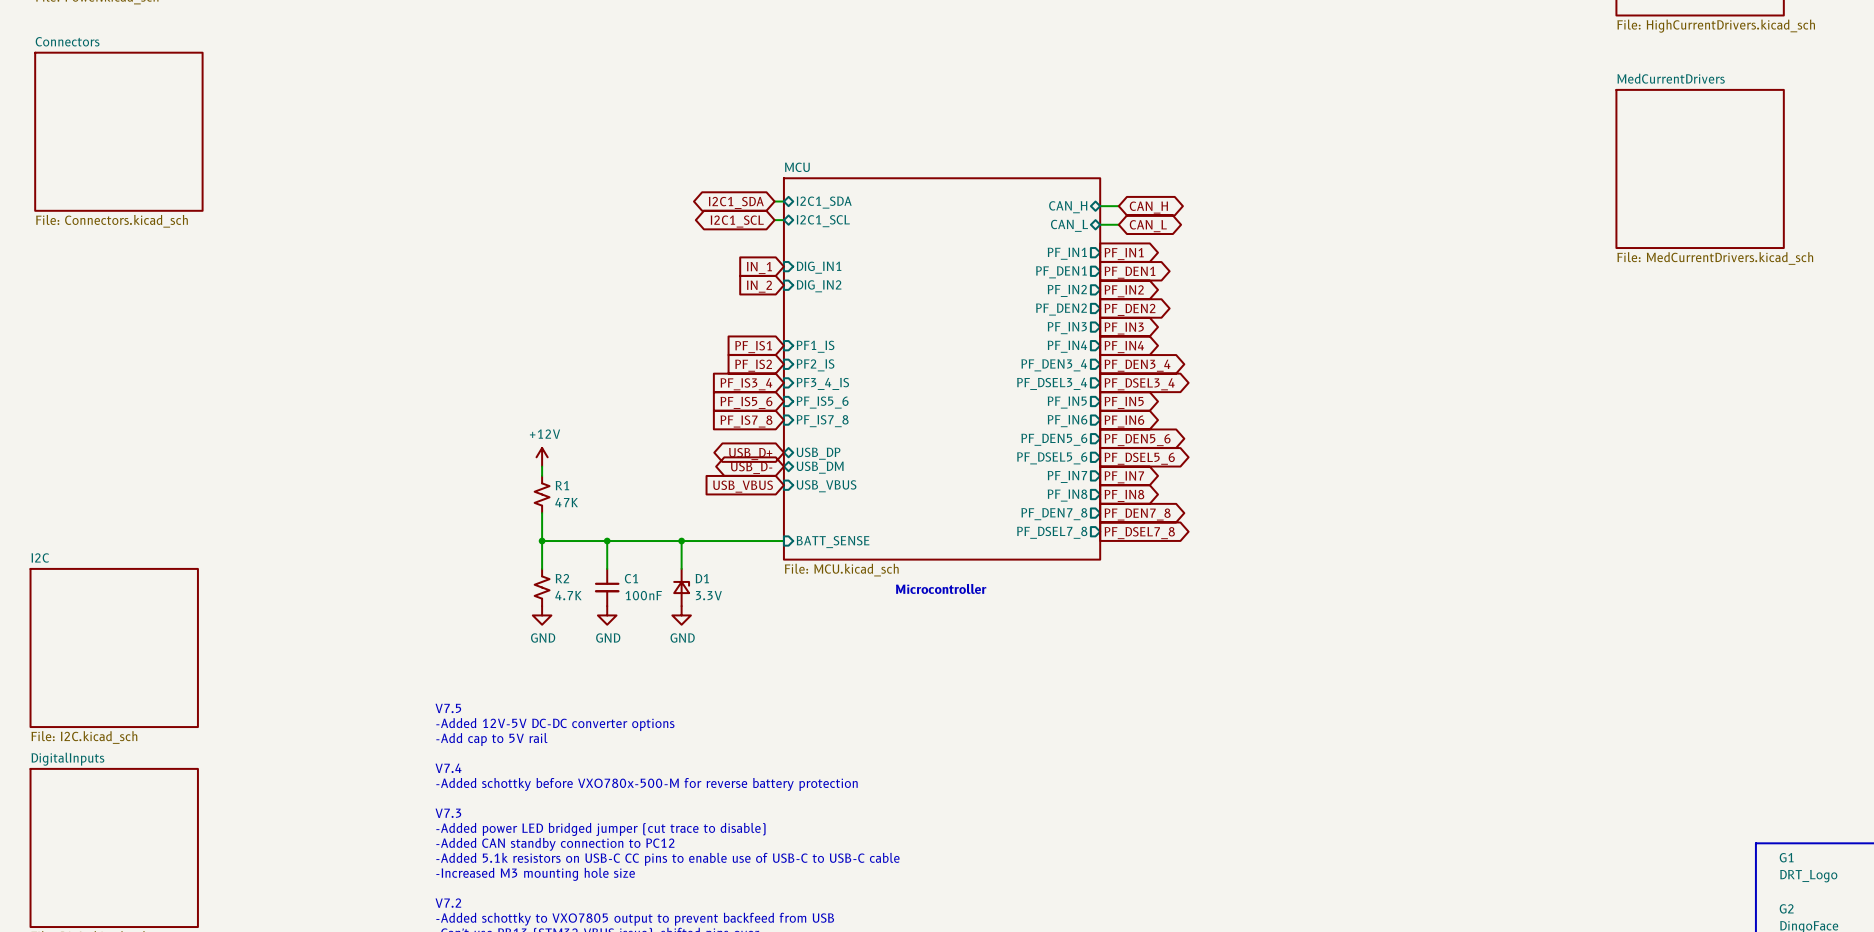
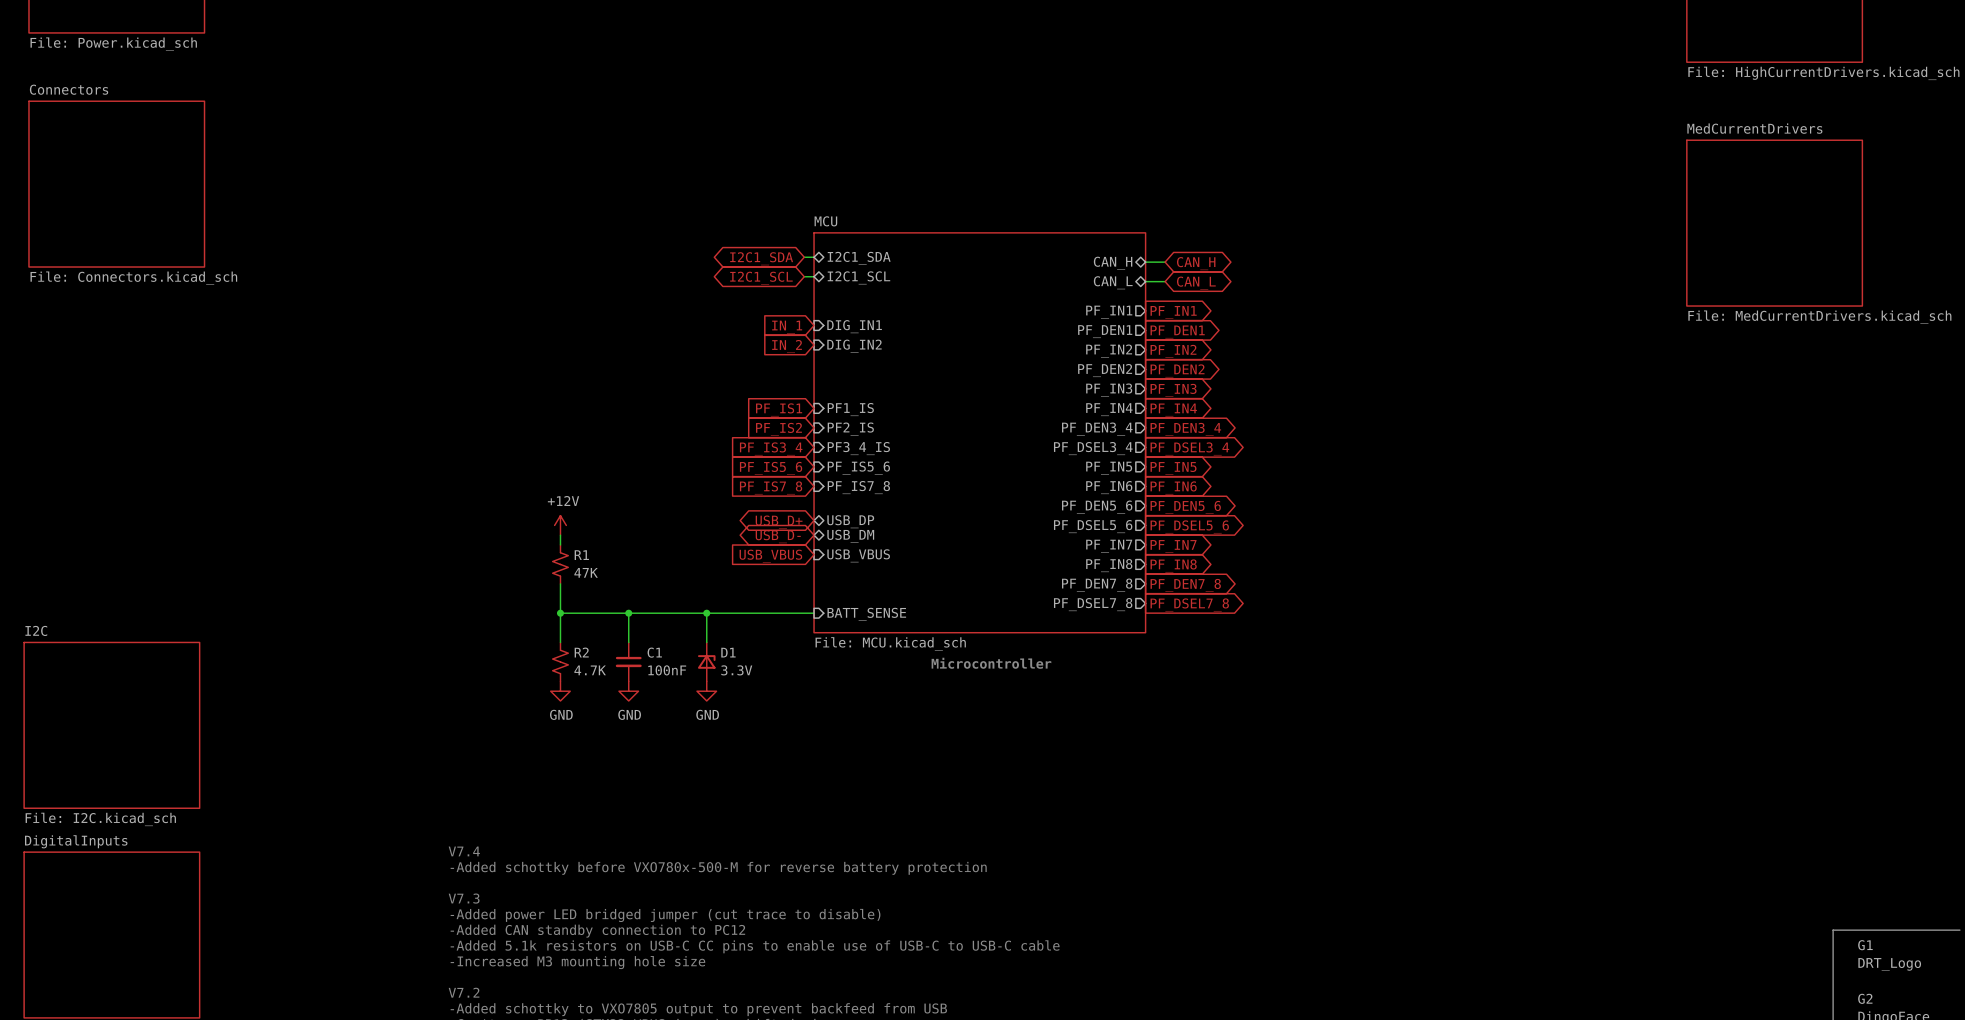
text: V7.5 (448, 708) -> none
text: -Added 12V-5V DC-DC converter options (555, 724) -> none
text: -Add cap to 5V rail (491, 739) -> none

